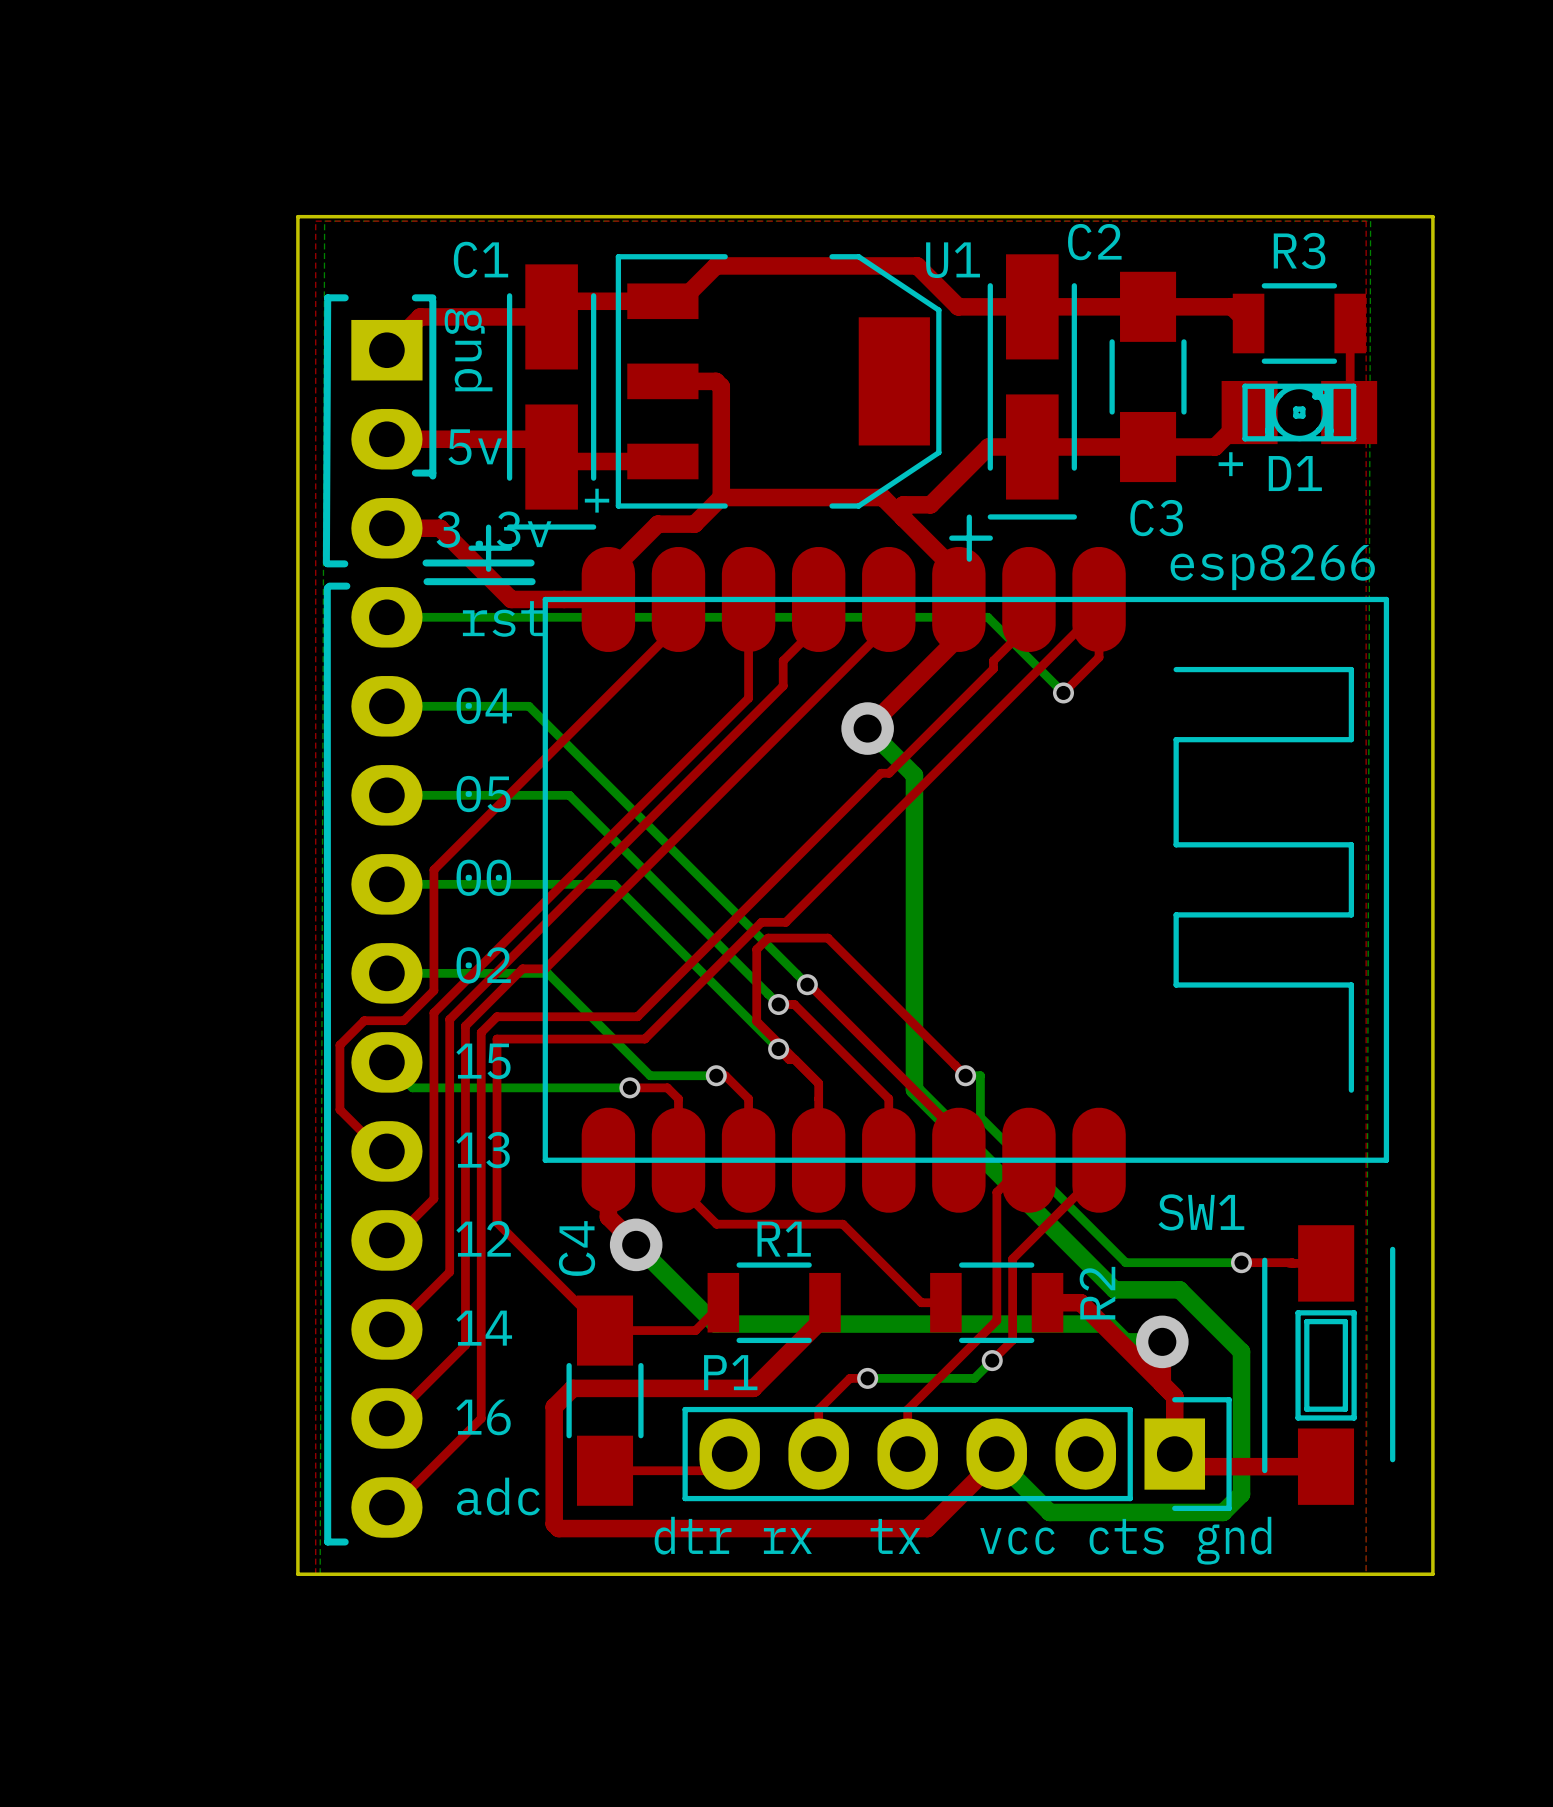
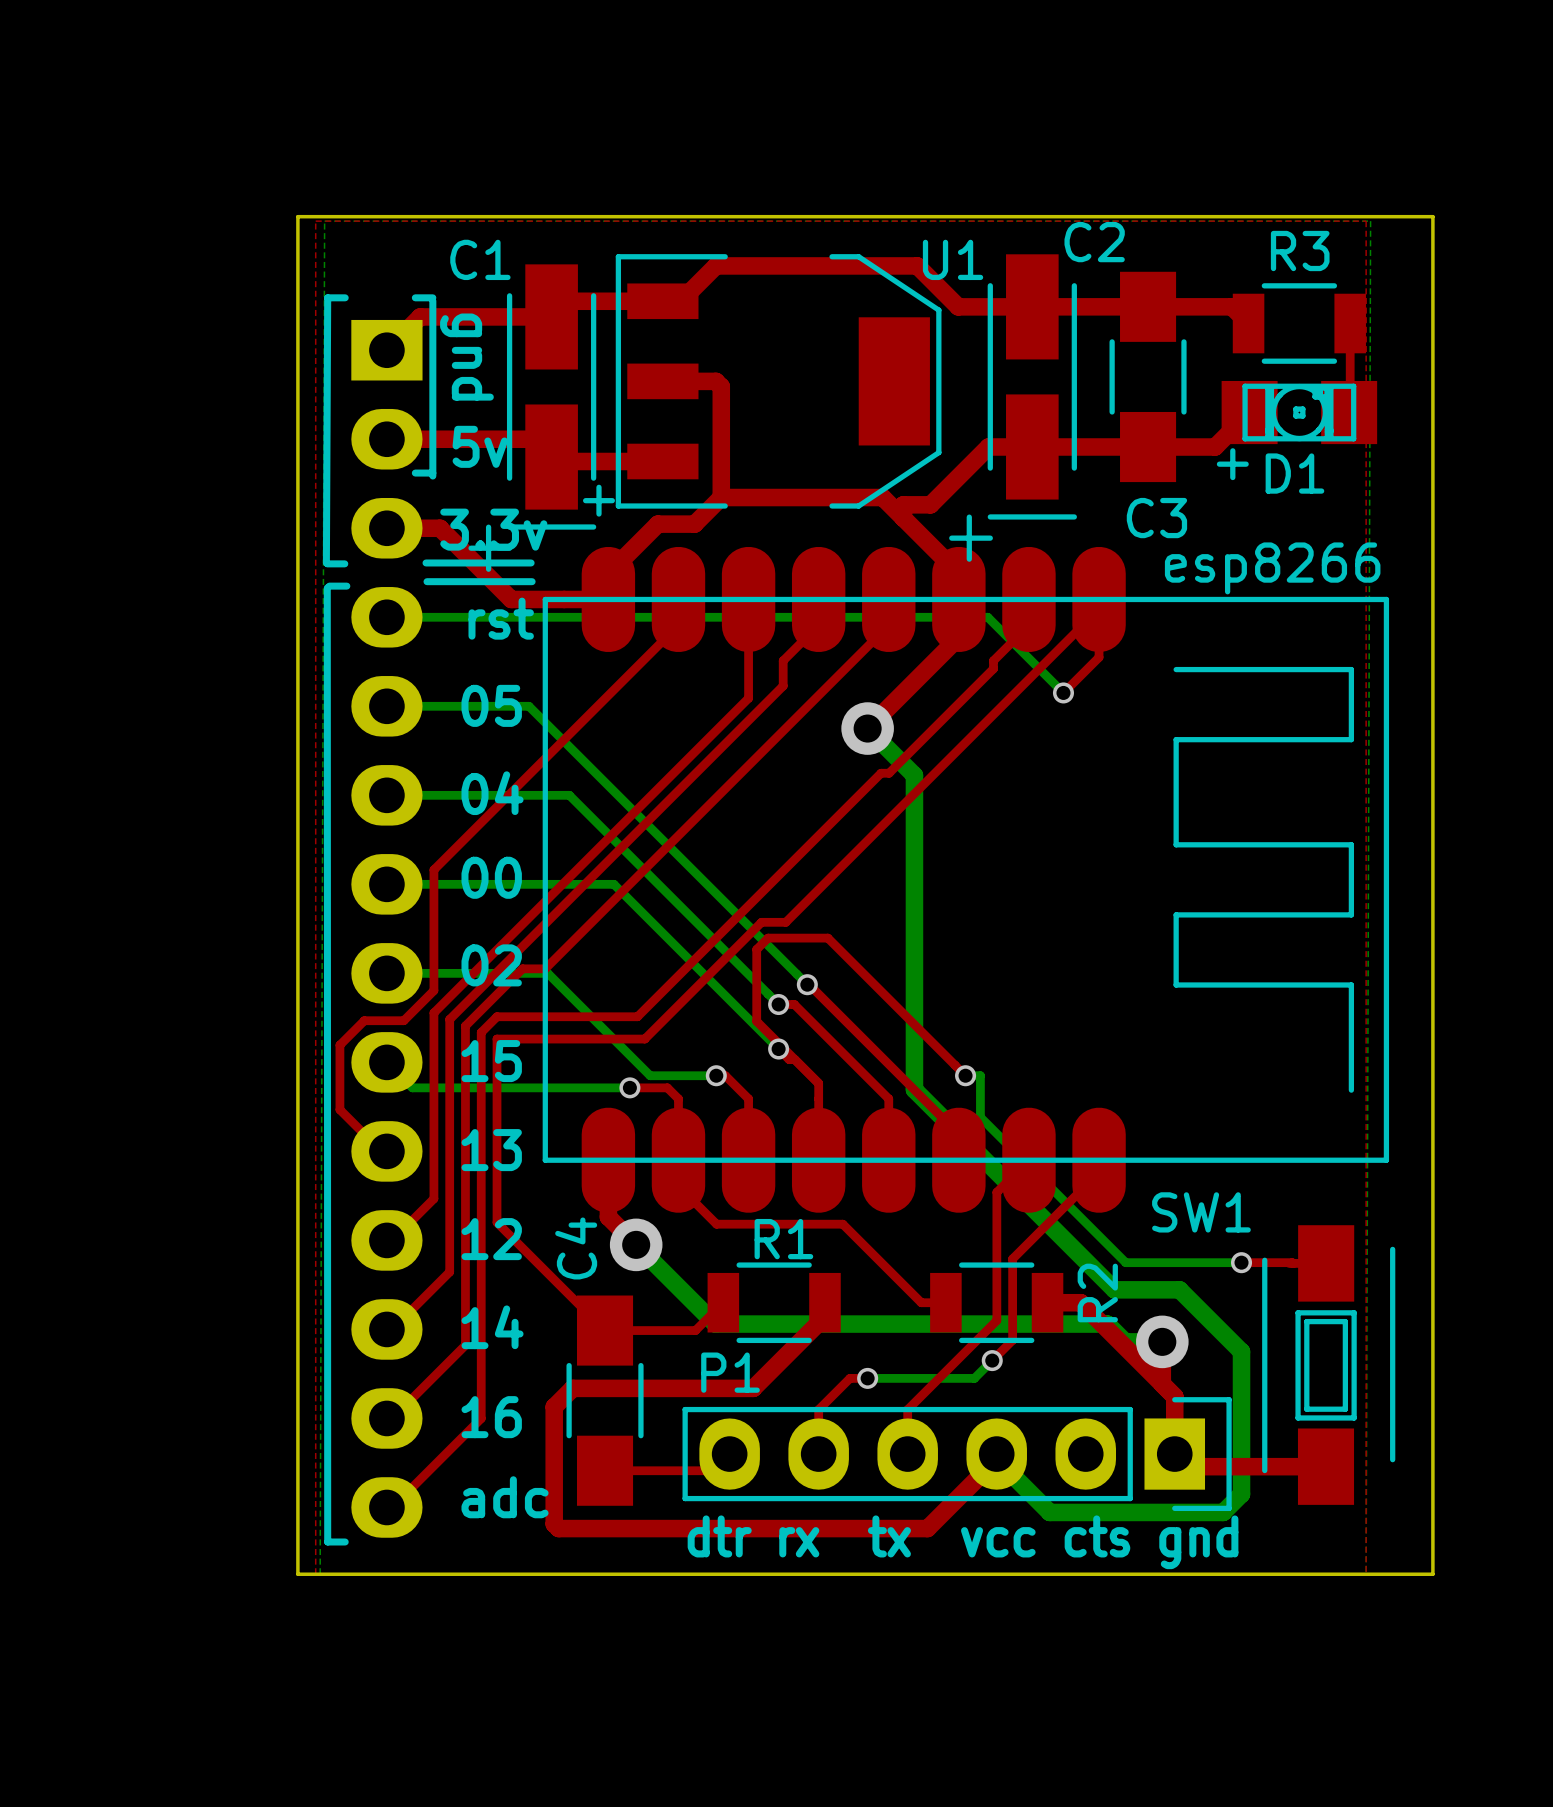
text: 04 (484, 705) -> 05 (491, 705)
text: 05 (483, 794) -> 04 (492, 793)

